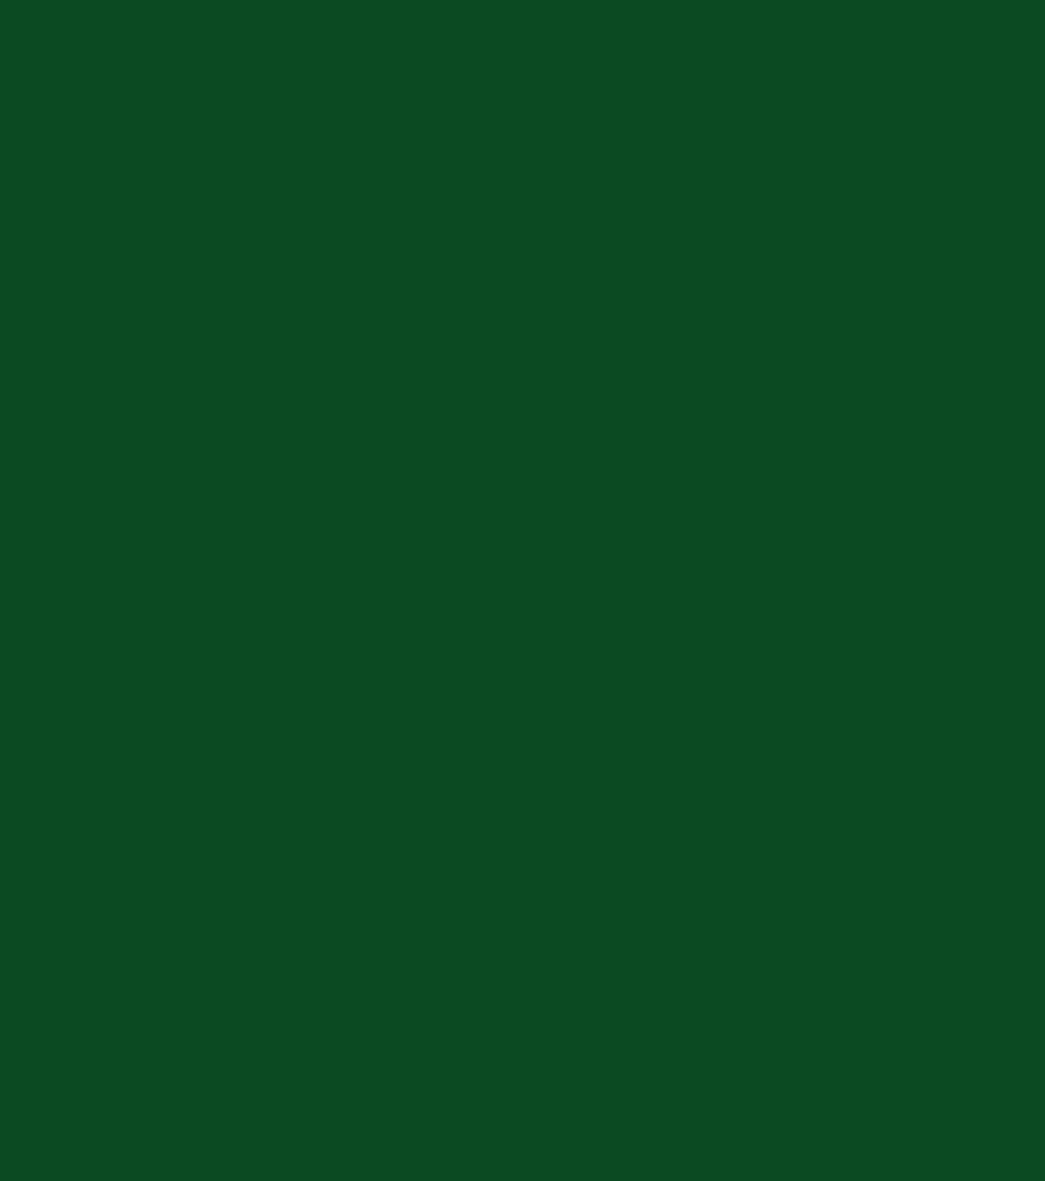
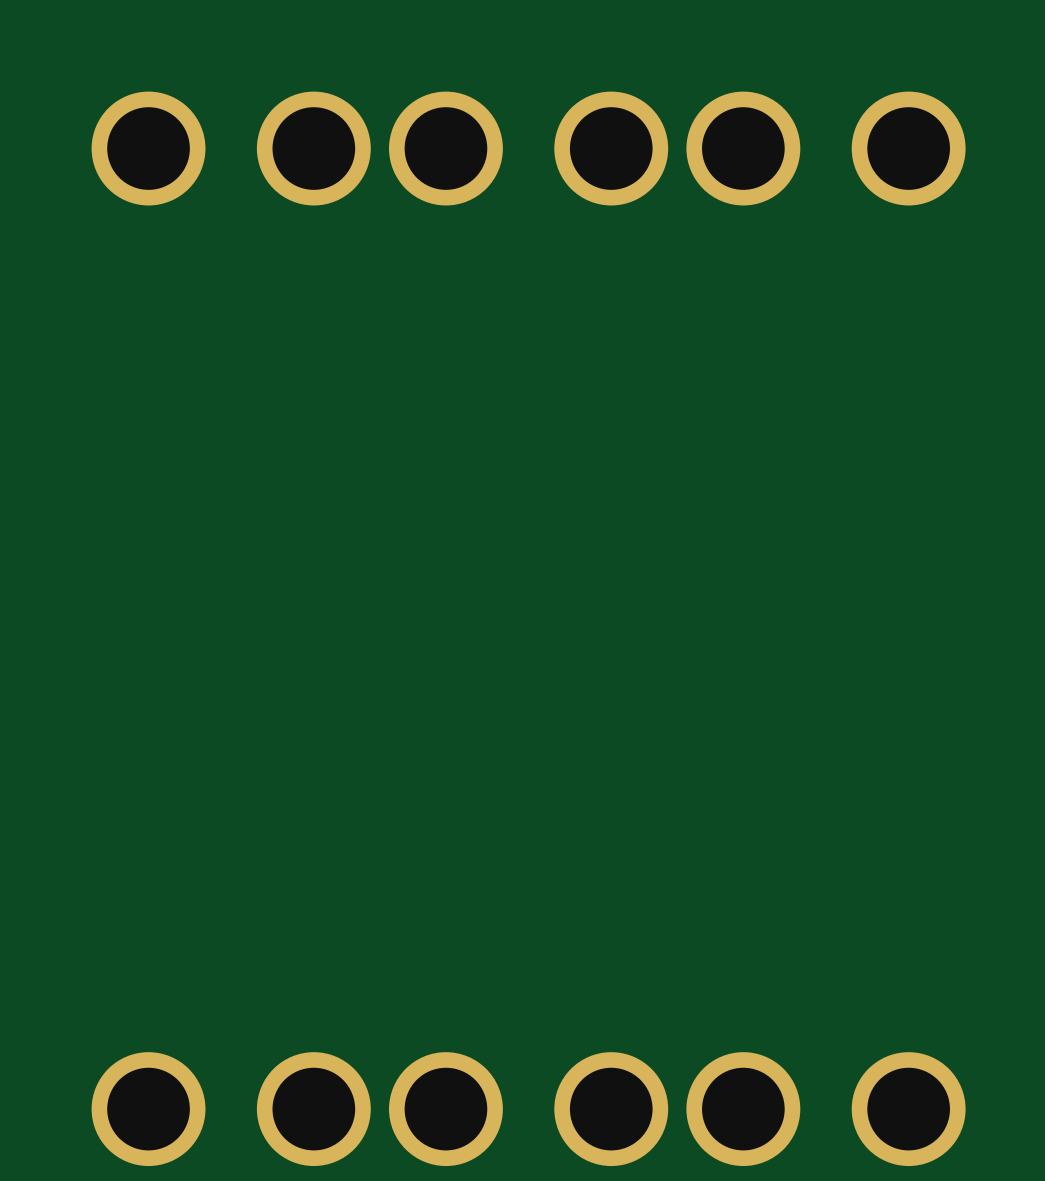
part: none -> (528, 148)
part: none -> (528, 1109)

